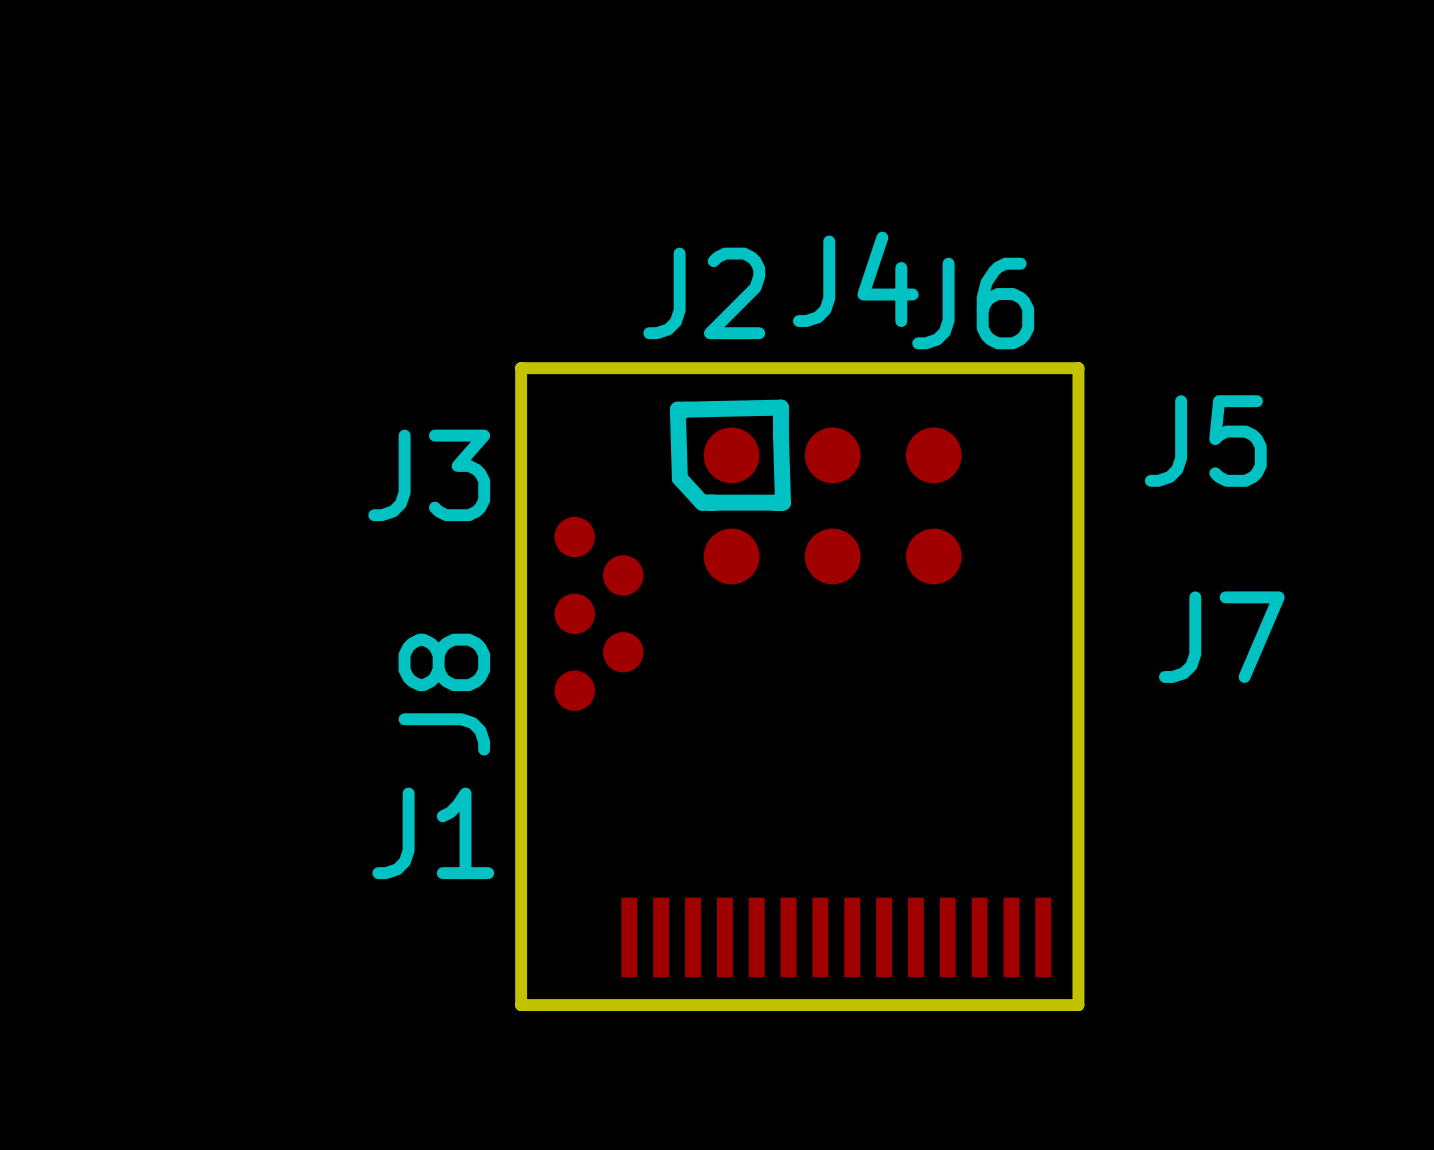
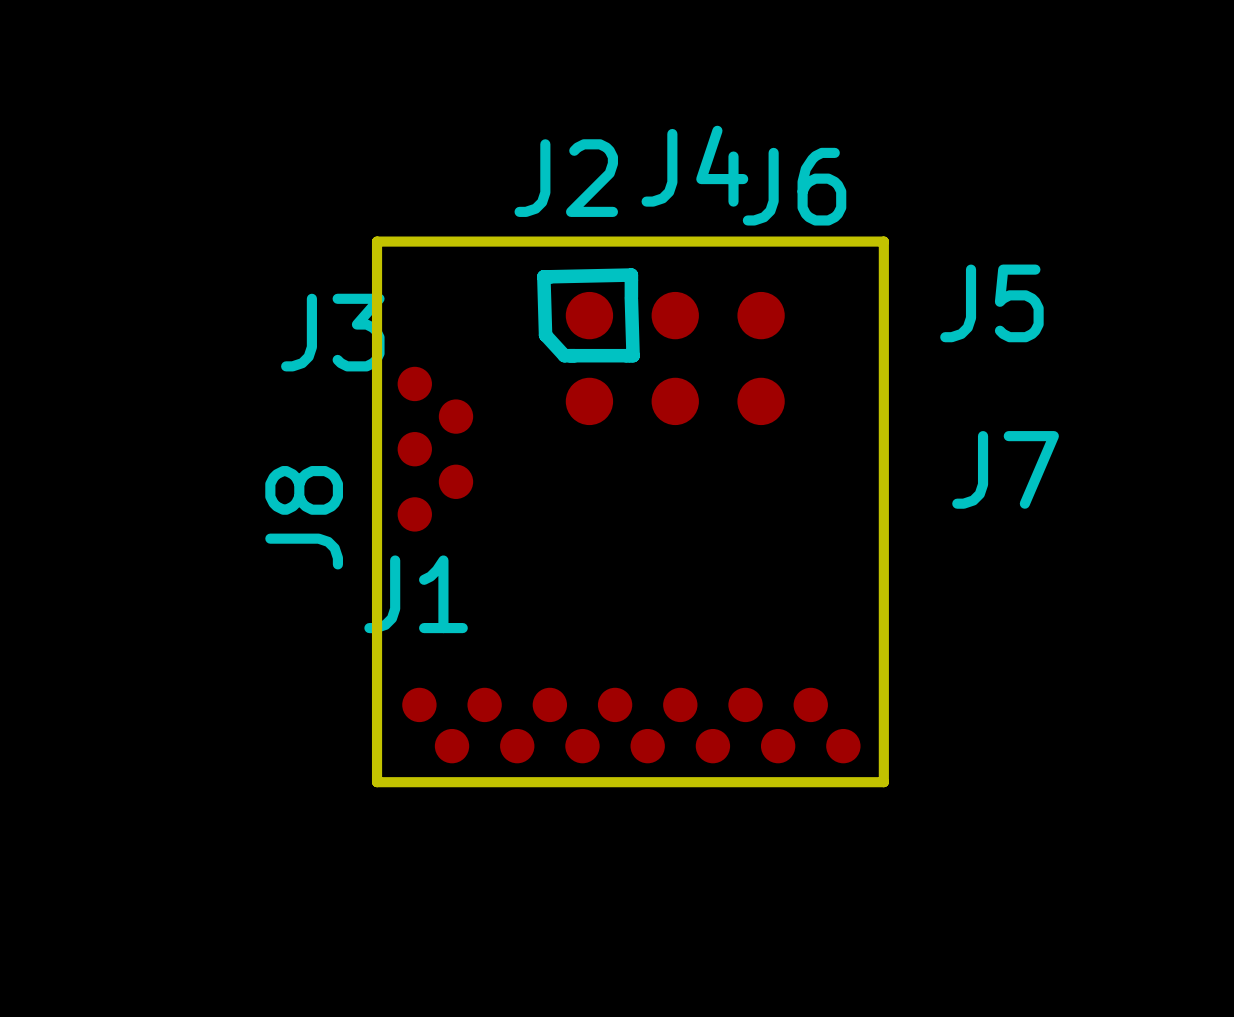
board edge: (521, 368) (521, 1005) -> (410, 241) (377, 241) (377, 782) (410, 782)
J8 position: (598, 613) -> (435, 449)
J1 footprint: [621, 897, 1052, 978] -> [402, 687, 861, 764]

